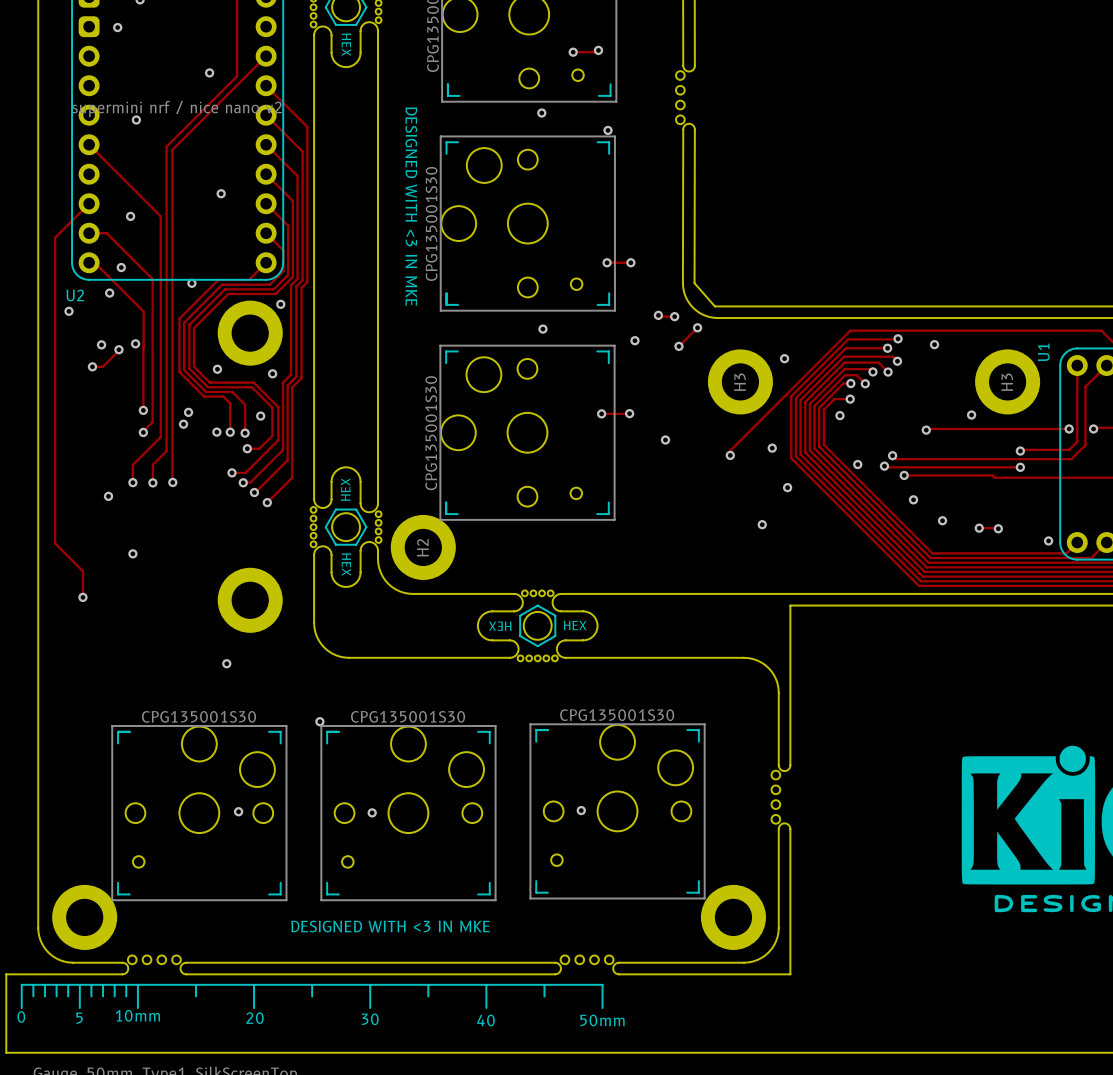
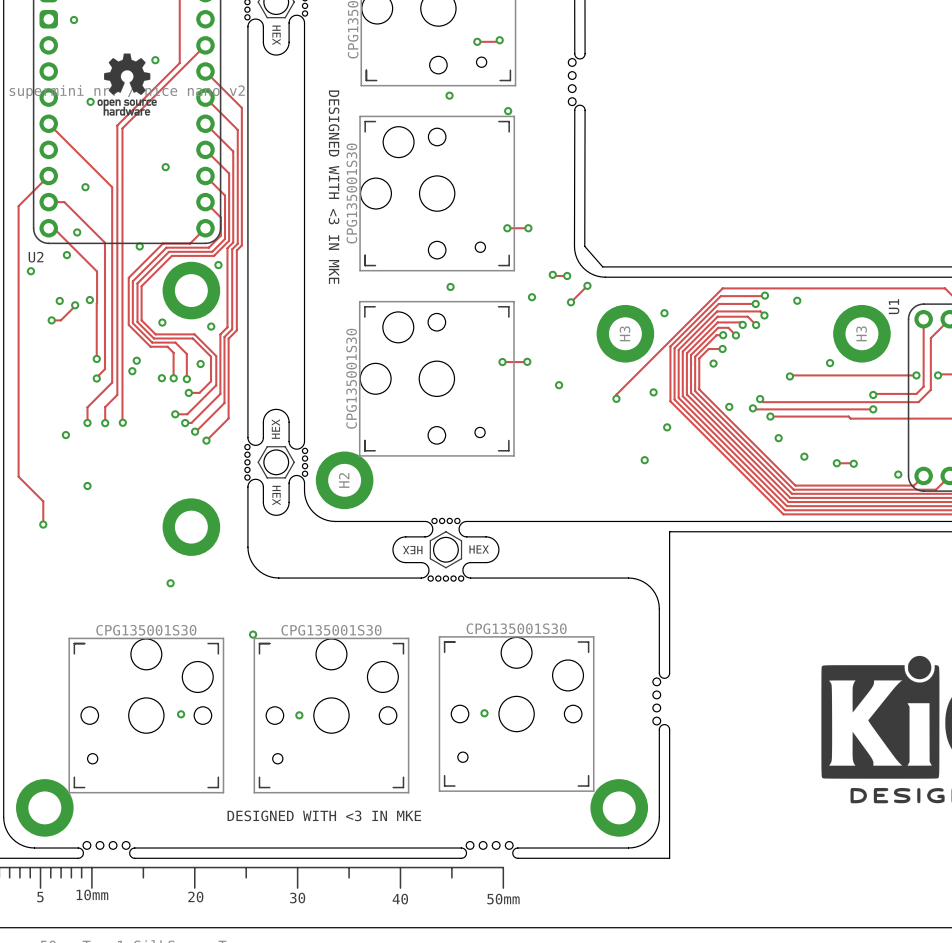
drawing: none -> [97, 53, 157, 116]

